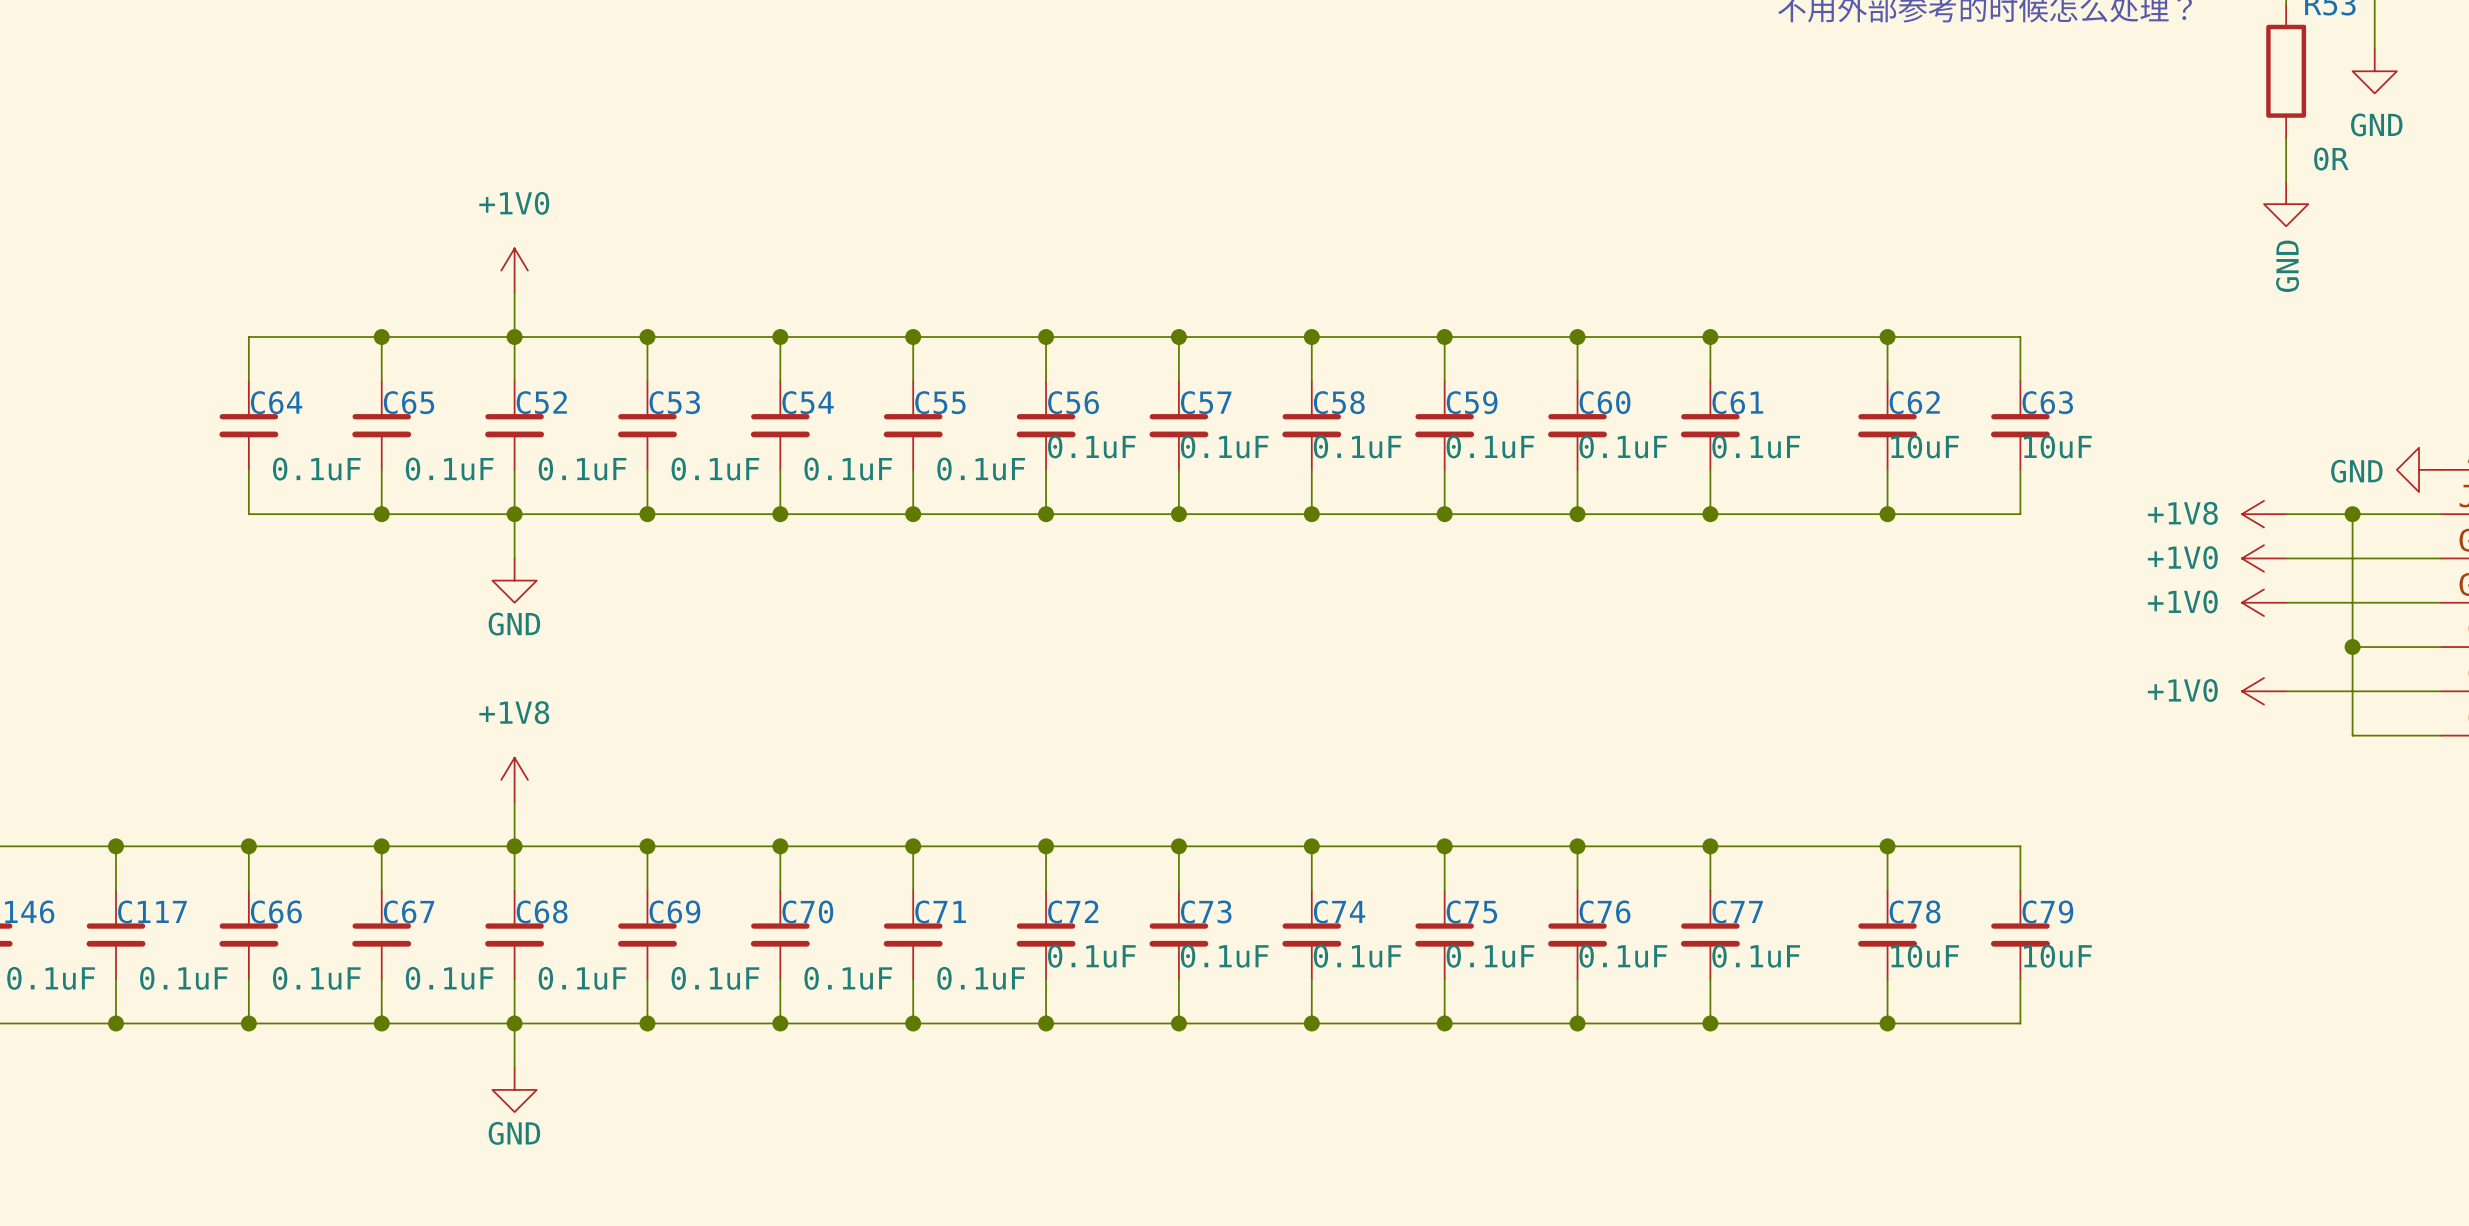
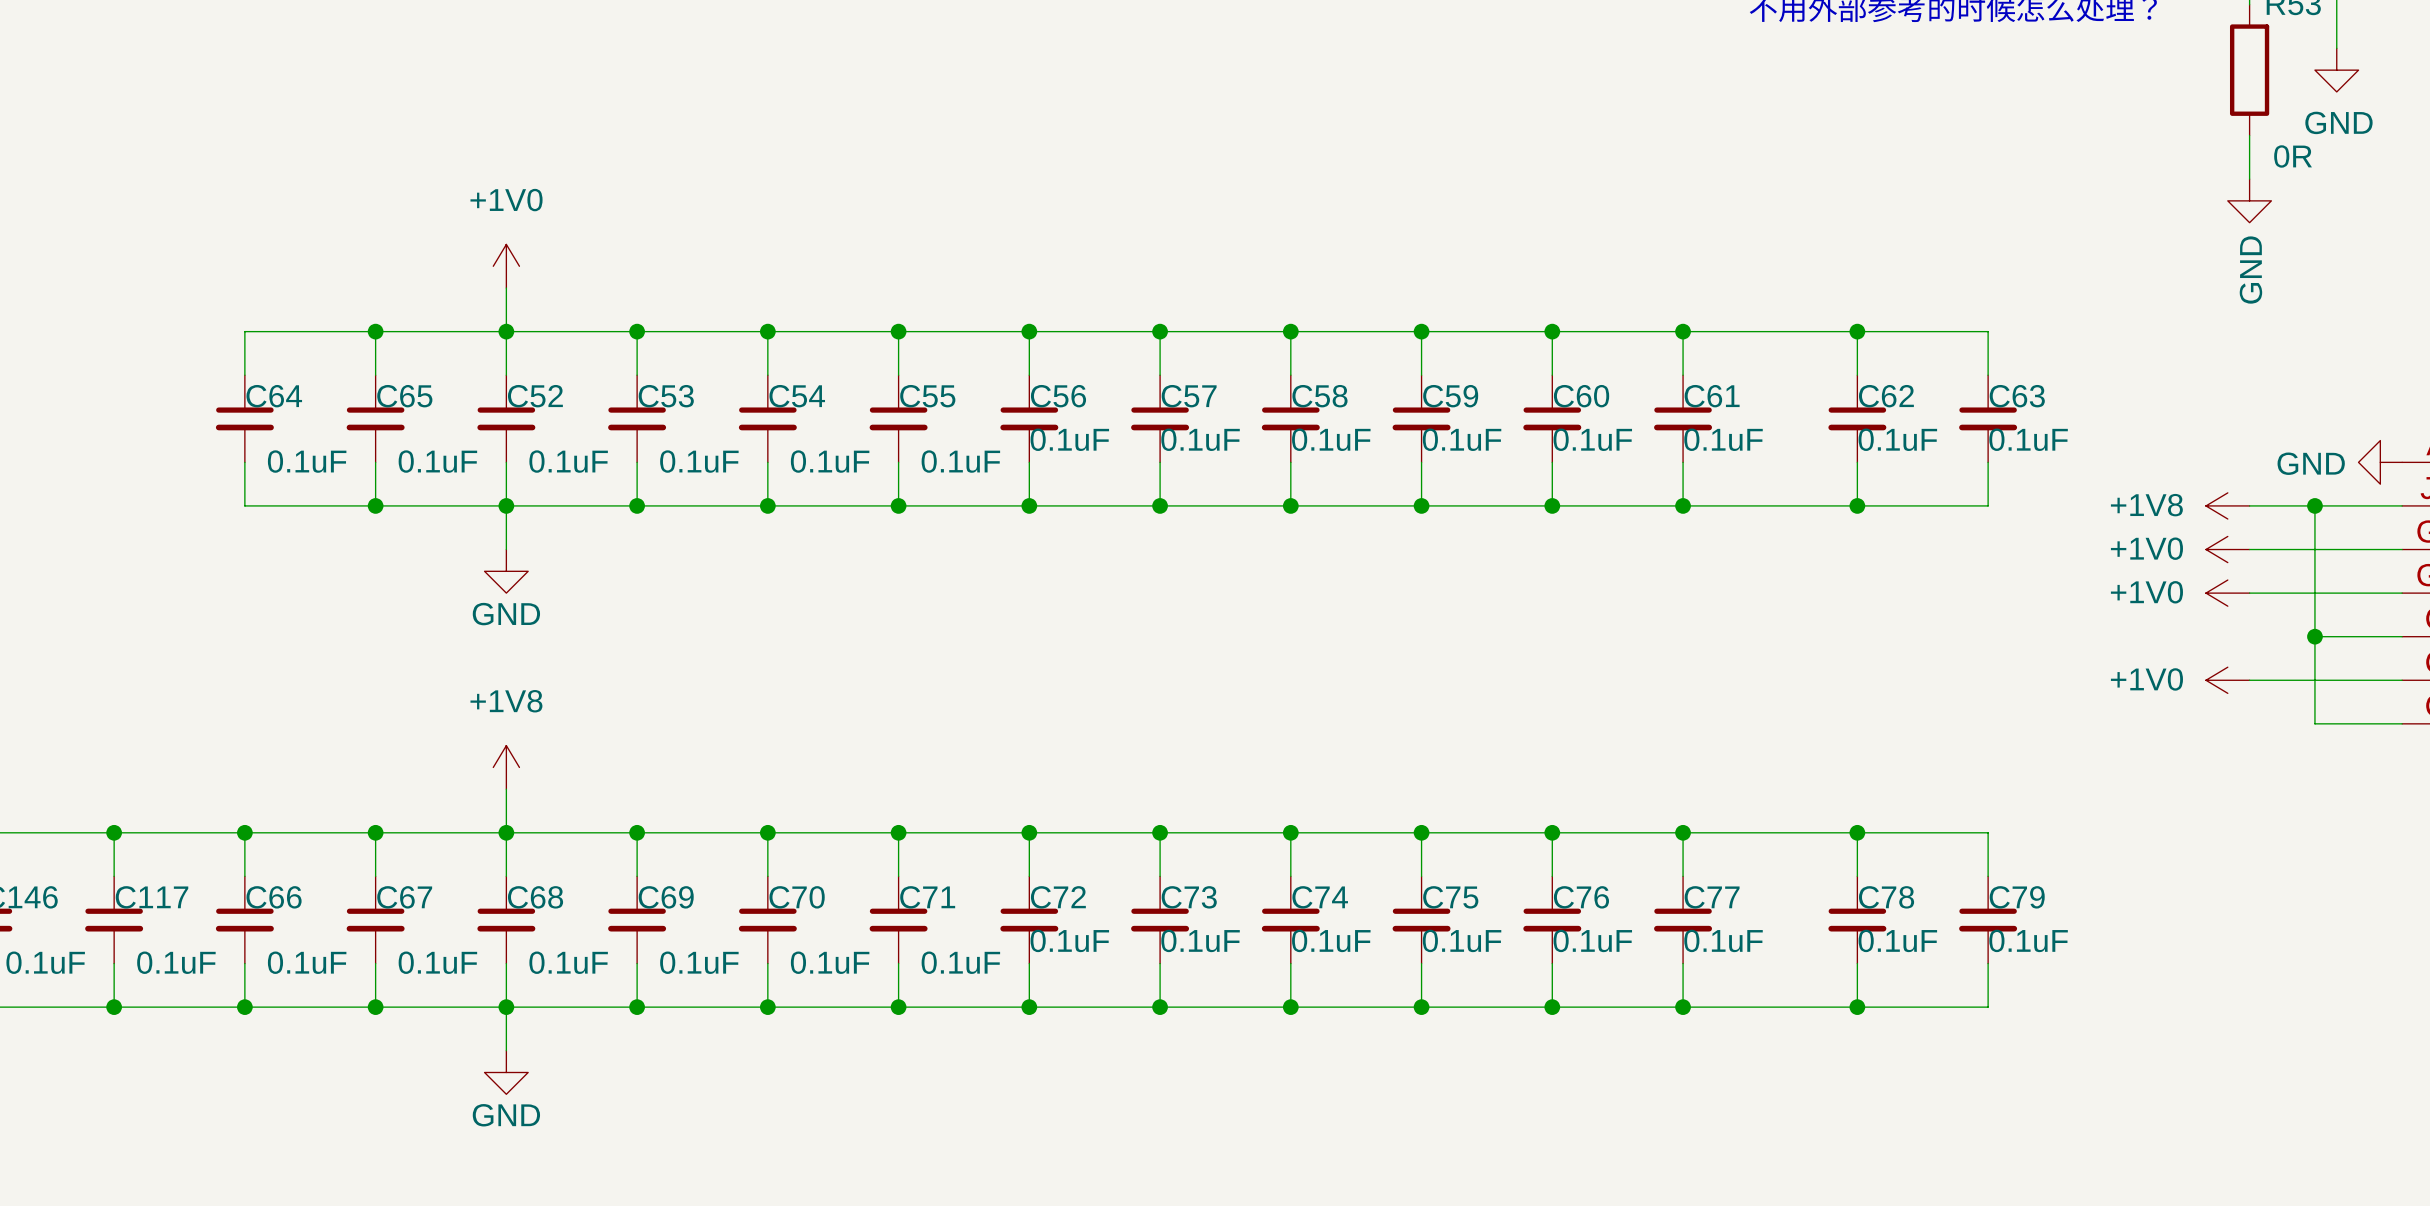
C62 value: 10uF (1925, 446) -> 0.1uF (1897, 439)
C63 value: 10uF (2057, 446) -> 0.1uF (2028, 439)
C78 value: 10uF (1925, 956) -> 0.1uF (1897, 940)
C79 value: 10uF (2057, 956) -> 0.1uF (2028, 940)

